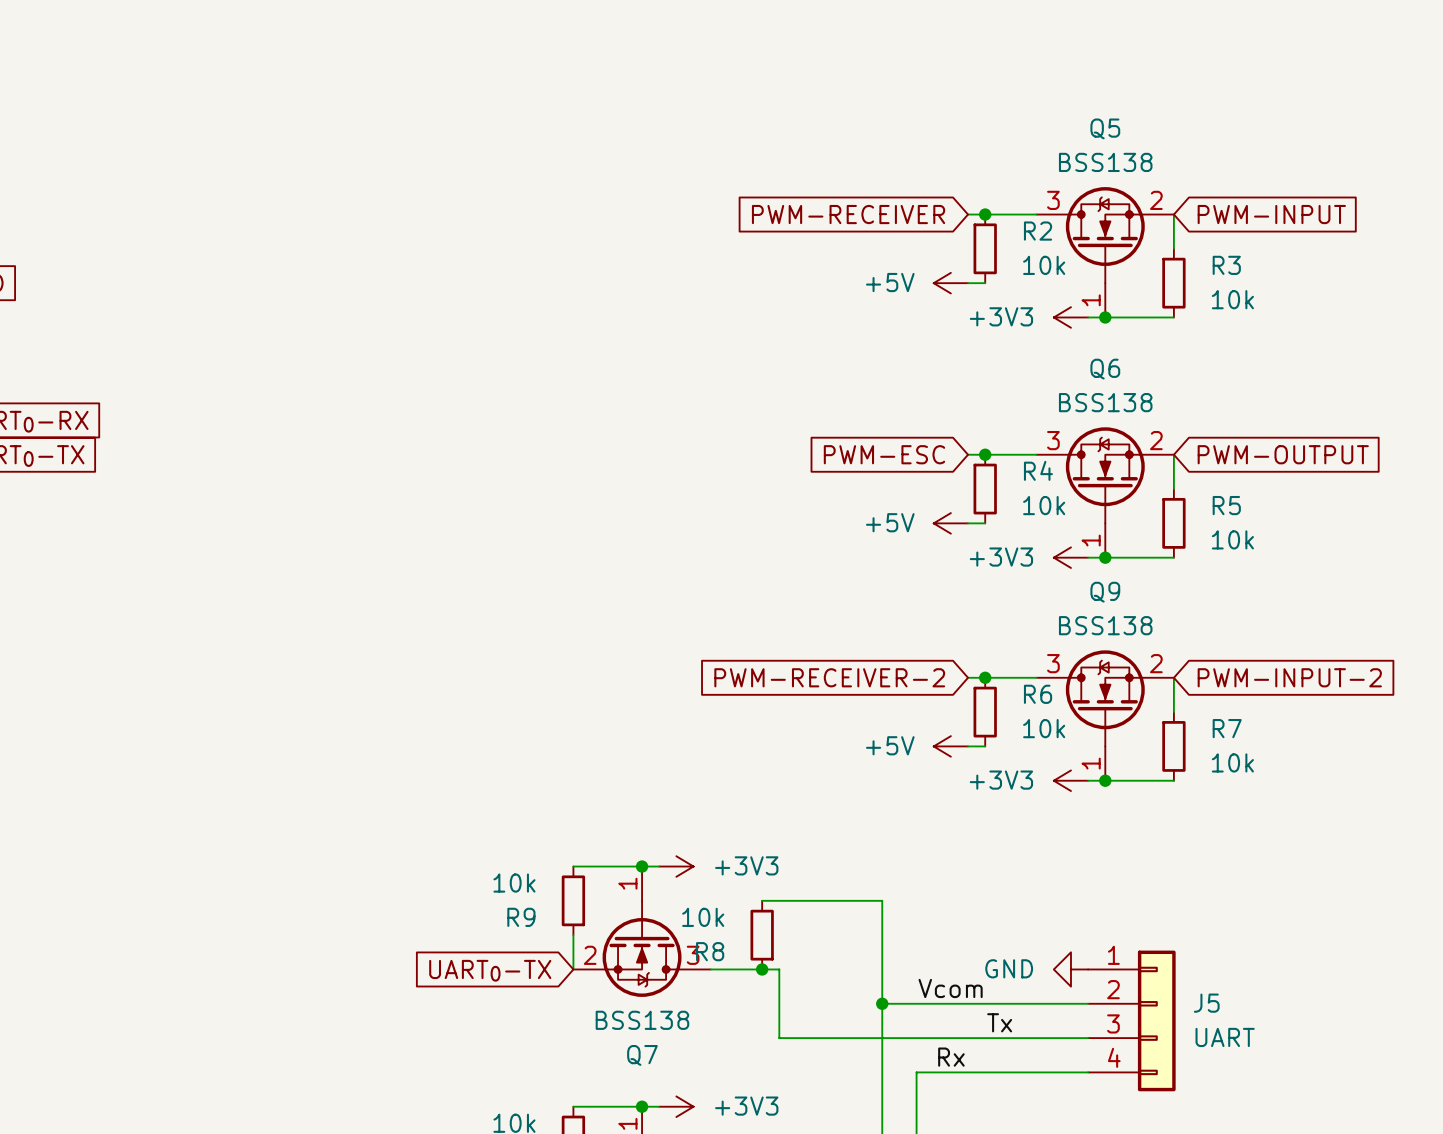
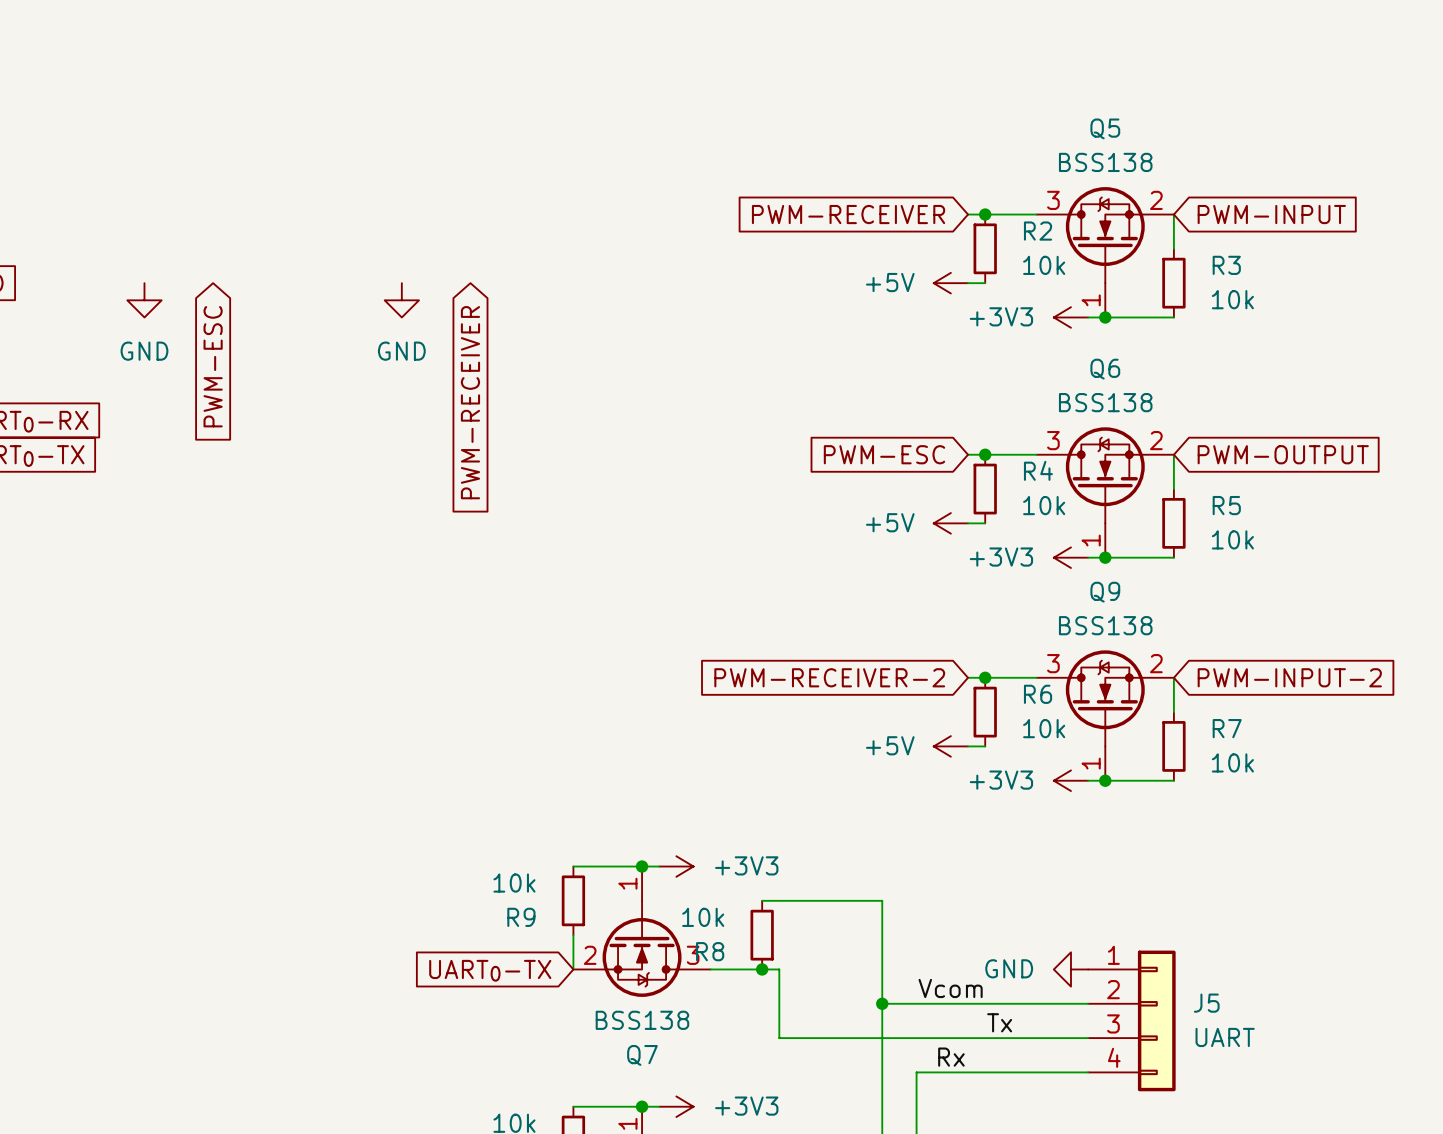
power symbol: none -> GND (144, 300)
power symbol: none -> GND (401, 300)
global label: none -> PWM-ESC (213, 366)
global label: none -> PWM-RECEIVER (470, 402)

